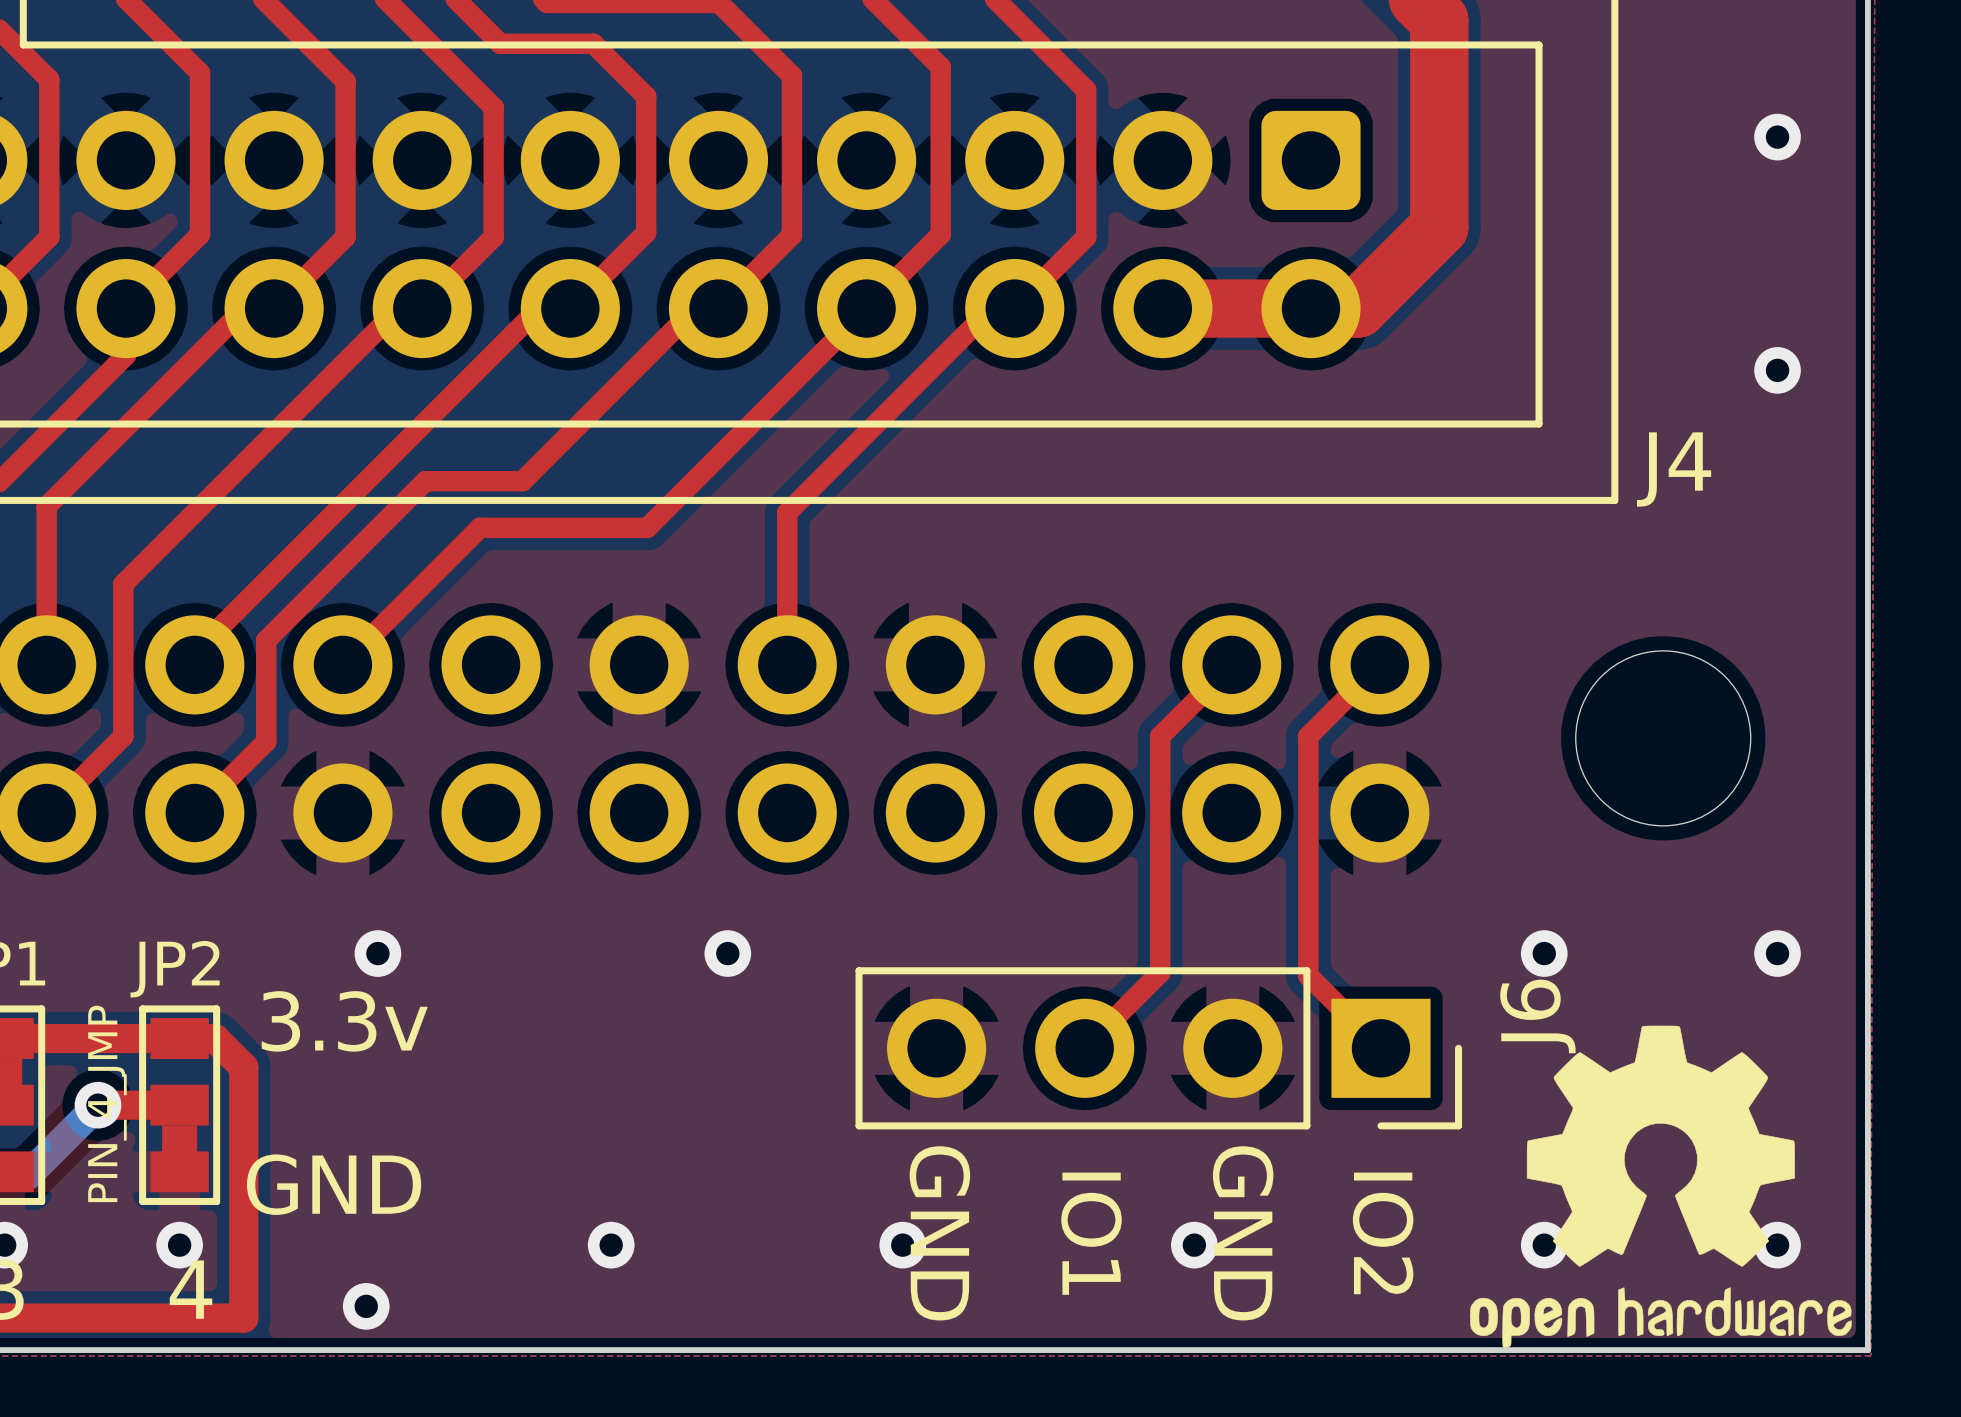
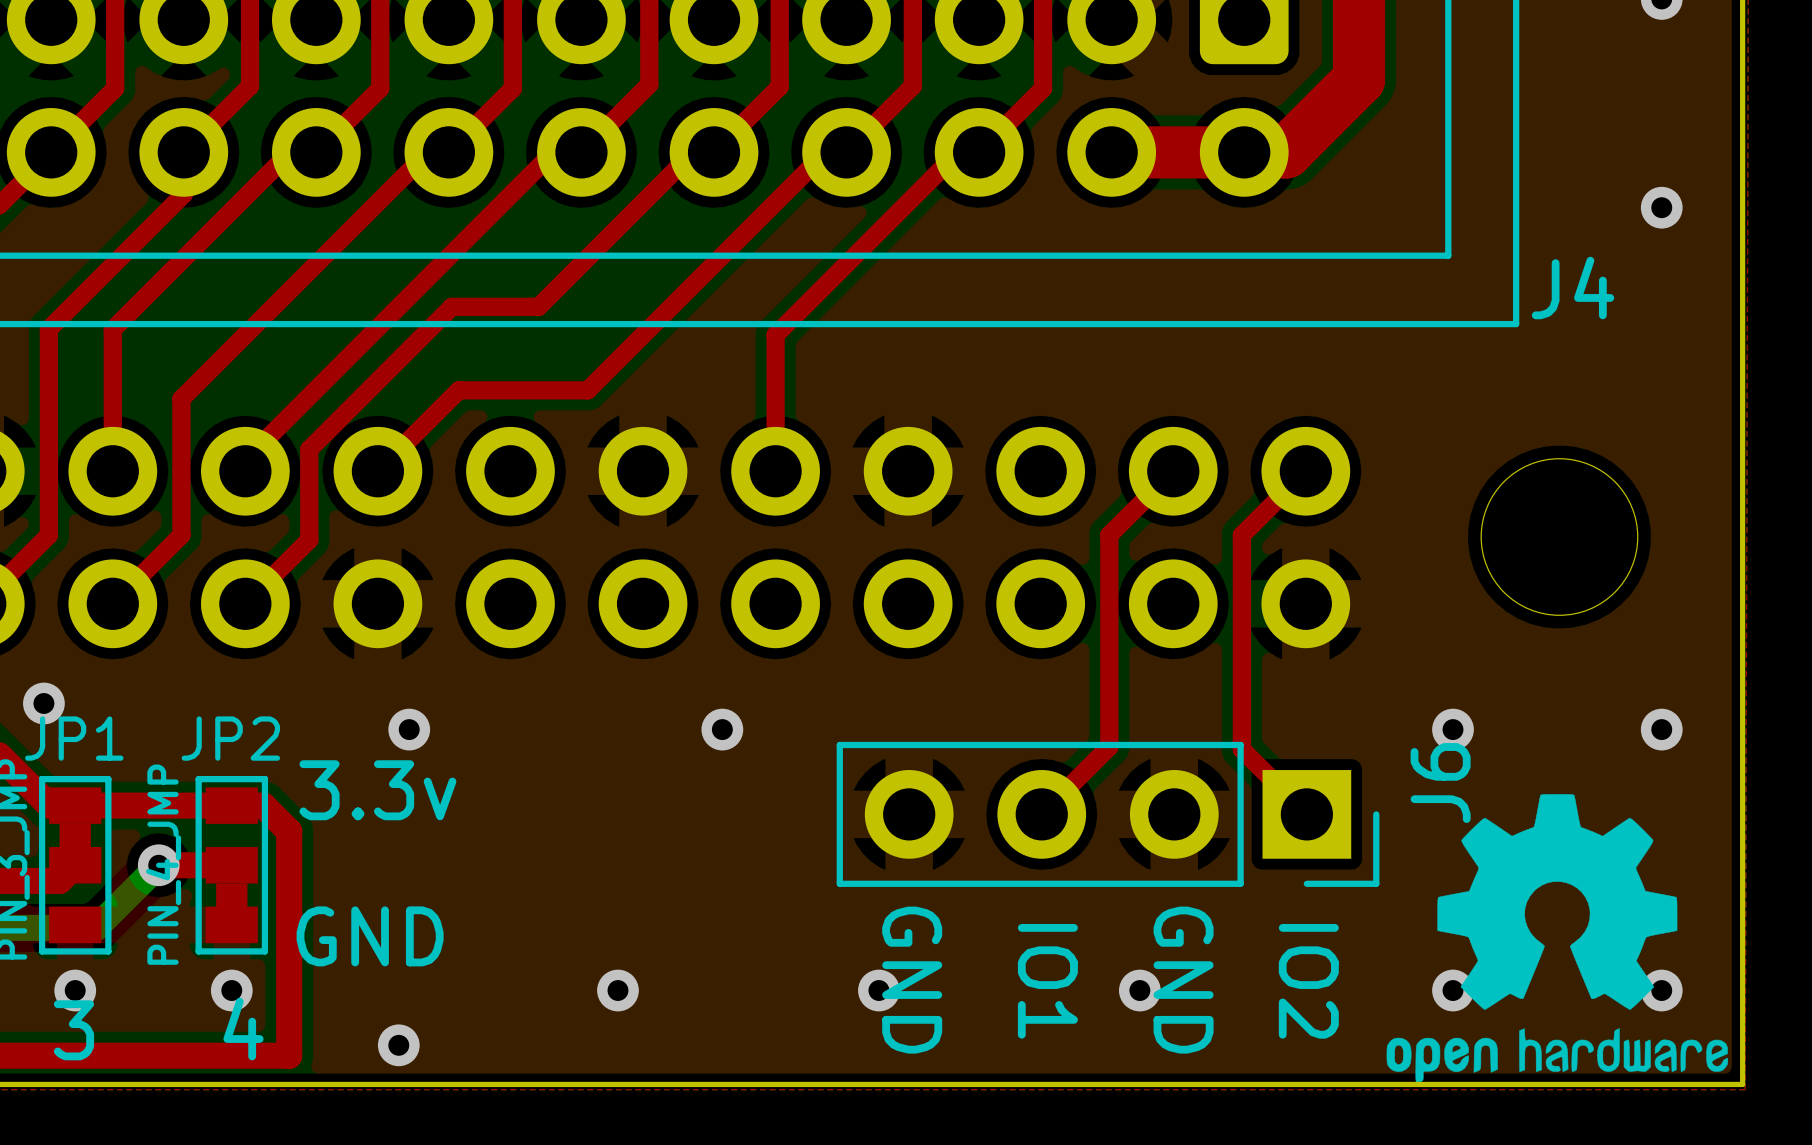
top track: (866, 308) (647, 527) (479, 527) (433, 574) -> (846, 152) (825, 152) (587, 390) (458, 390)

